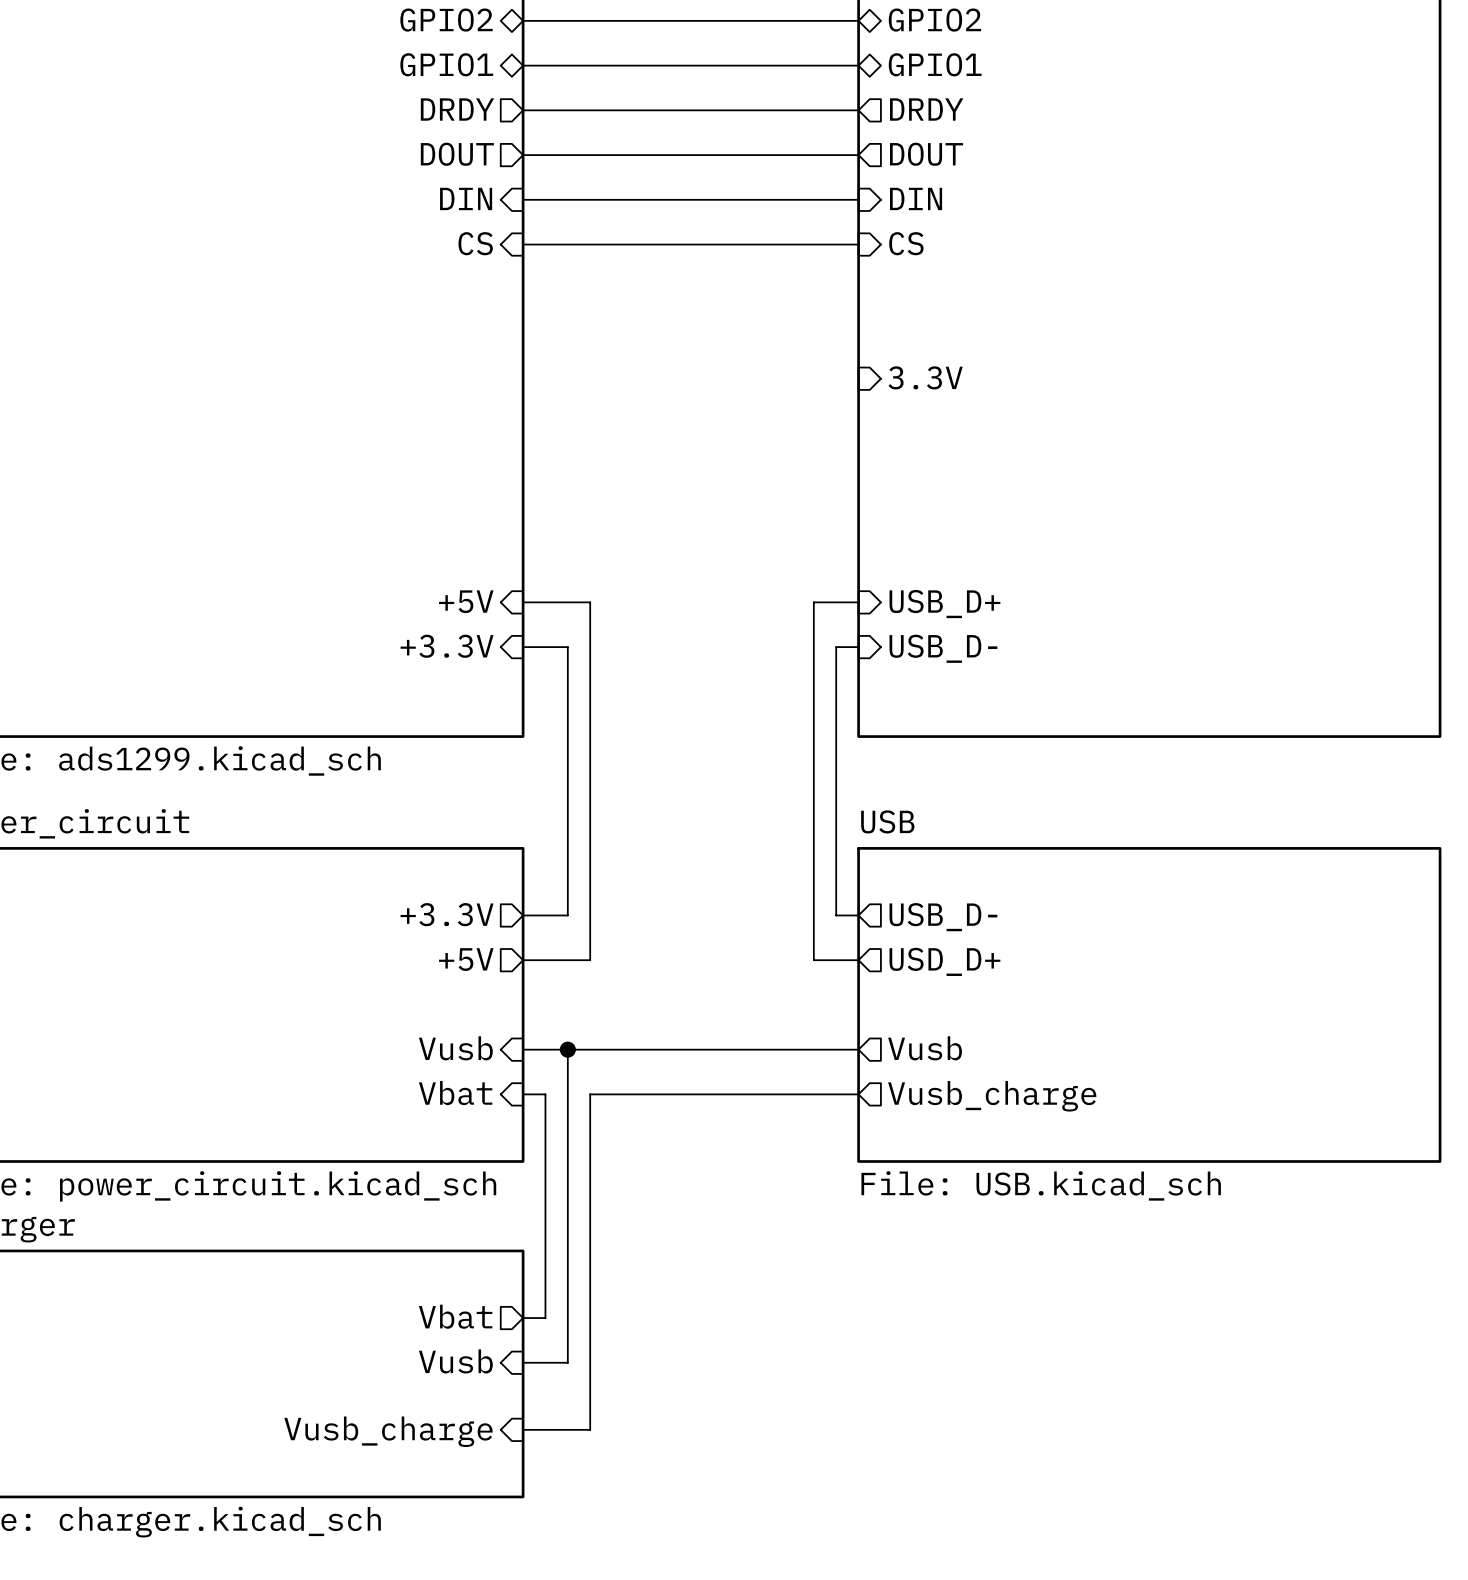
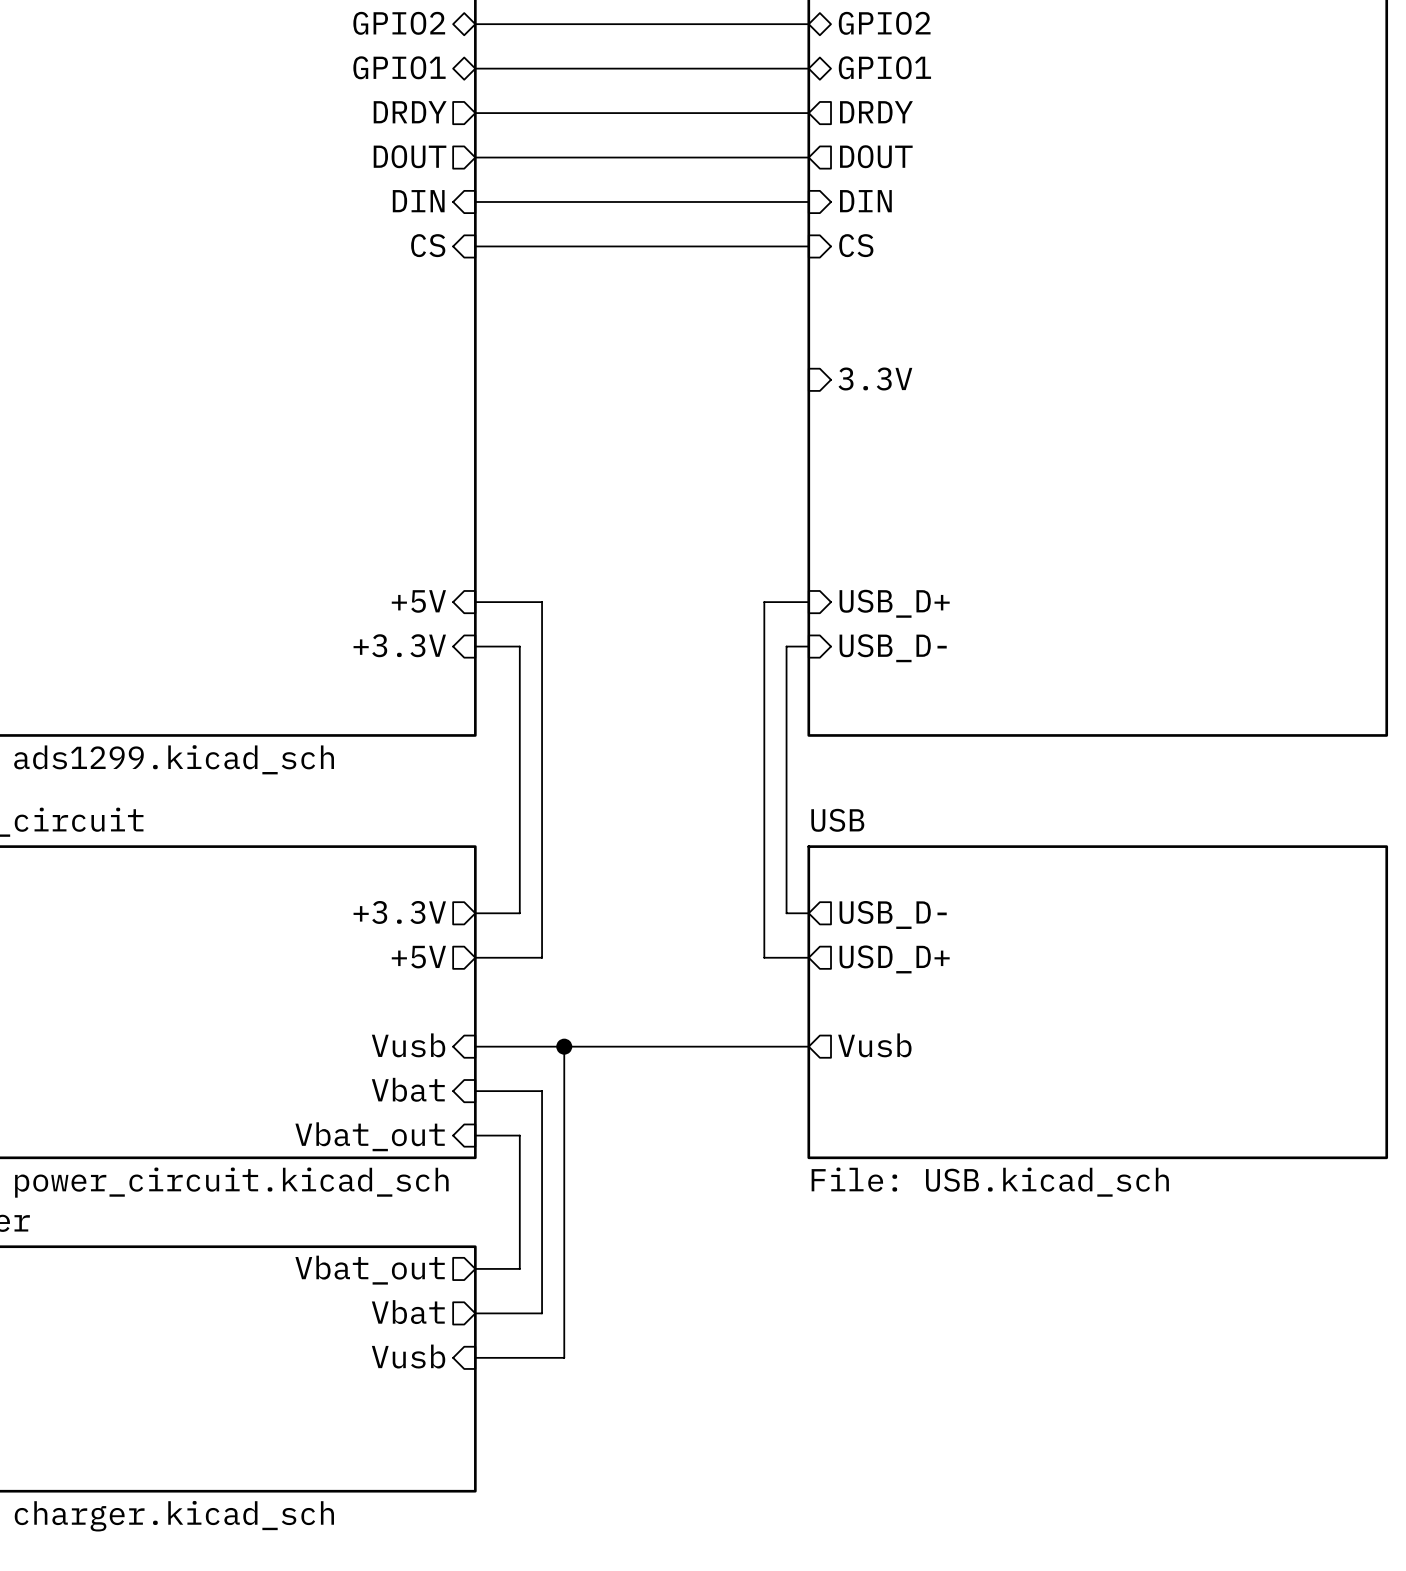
wire: (567, 1049) (567, 1139) -> (475, 1135) (519, 1135)
junction position: (567, 1049) -> (564, 1046)
wire: none -> (564, 1046) (564, 1357) (519, 1357)
wire: (545, 1094) (545, 1318) -> (497, 1091) (542, 1091)
wire: (590, 1094) (858, 1094) -> none
sheet pin: Vusb_charge (992, 1096) -> none
sheet pin: none -> Vbat_out (370, 1136)
wire: (567, 1273) (567, 1362) -> (519, 1268) (475, 1268)
sheet pin: none -> Vbat_out (370, 1270)
wire: (590, 1318) (590, 1429) (523, 1429) -> (542, 1313) (497, 1313)
sheet pin: Vusb_charge (388, 1431) -> none

